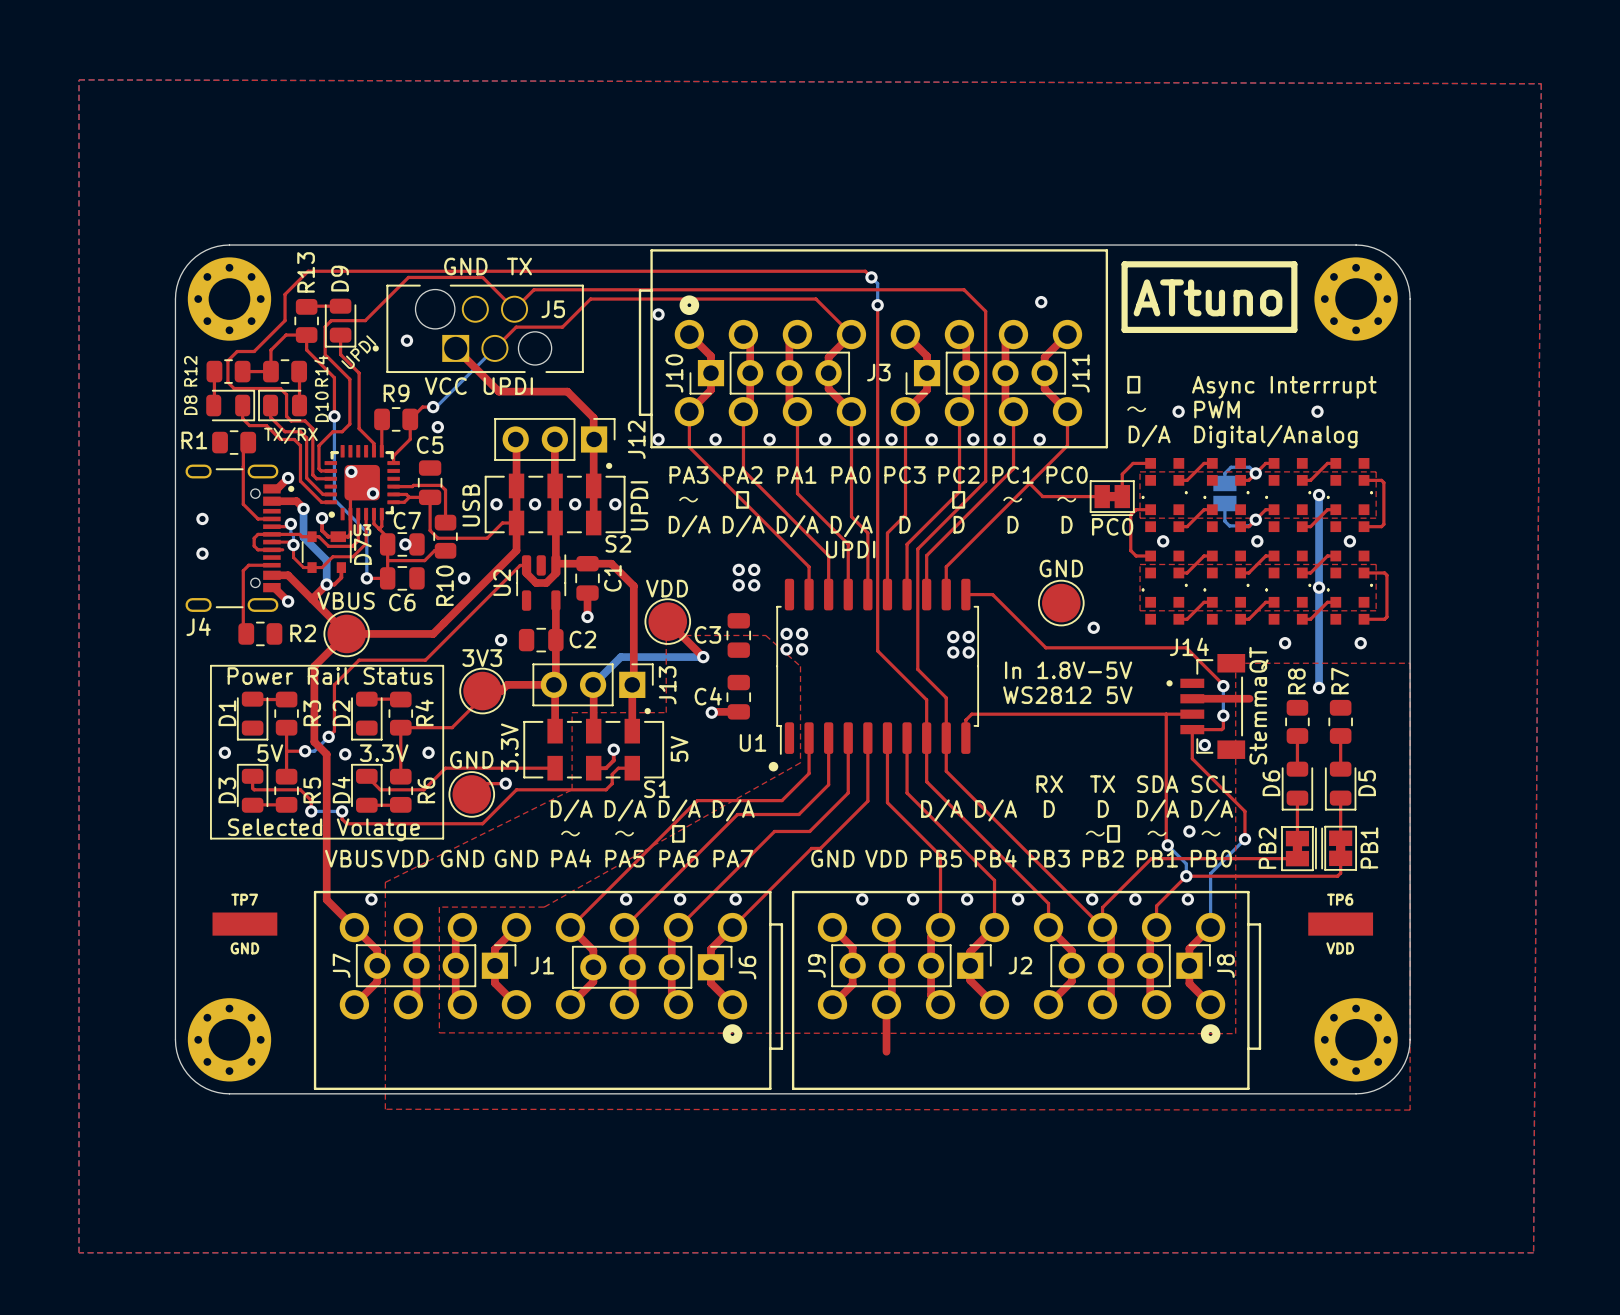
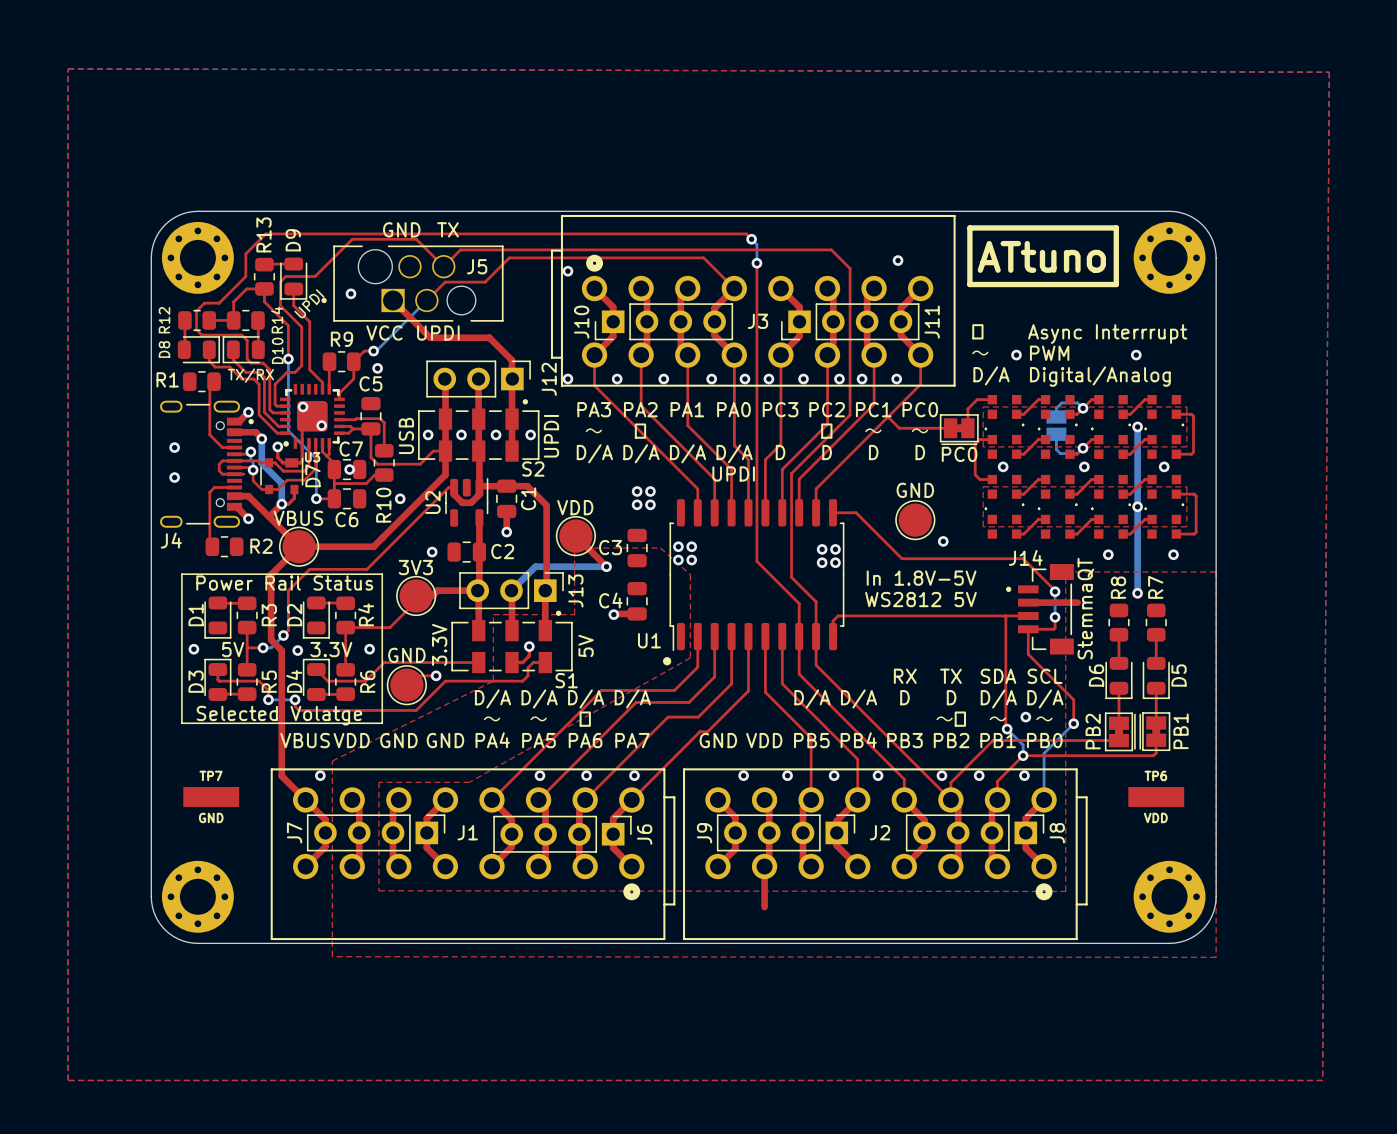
via: (1204, 745) -> none

